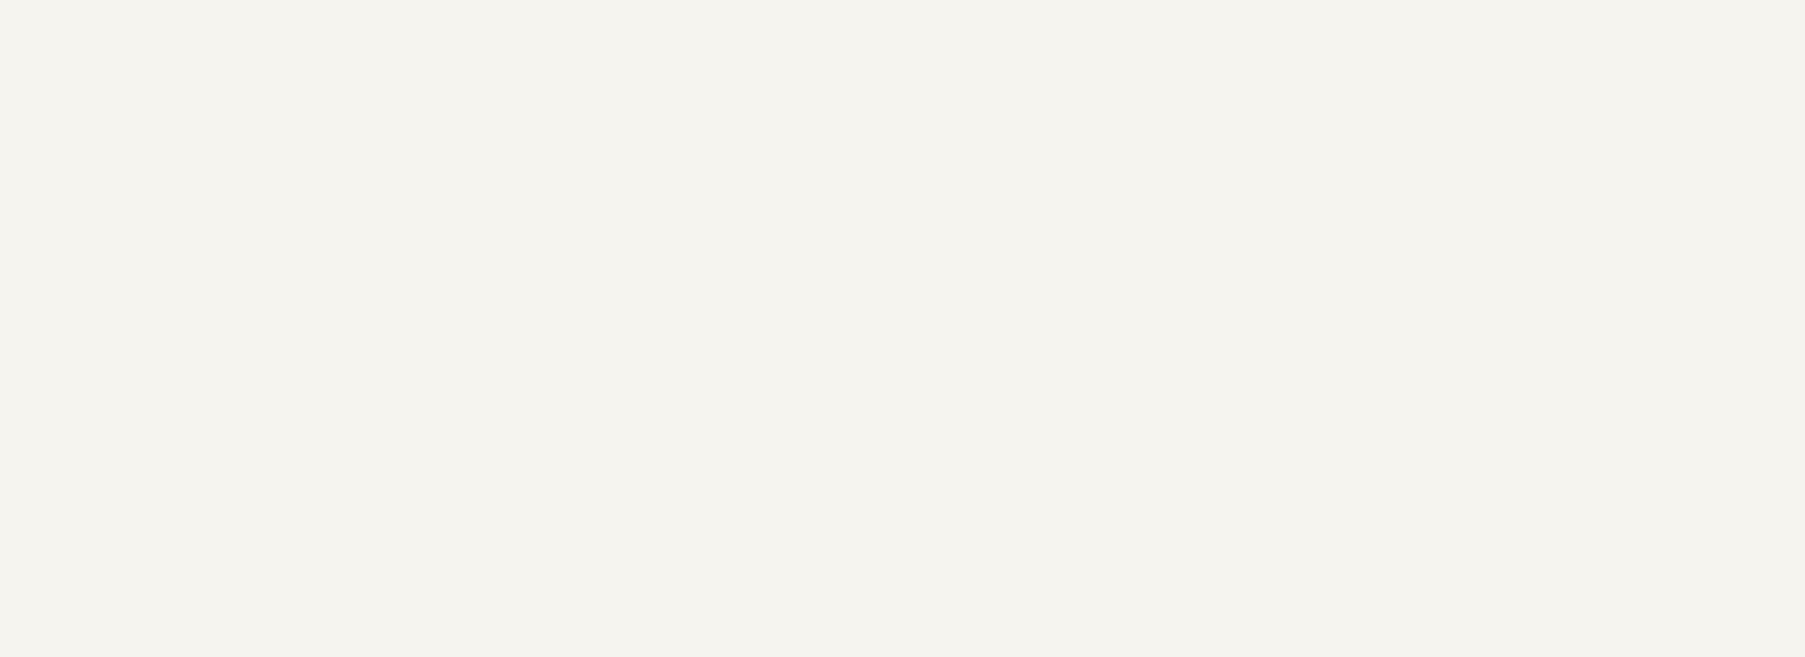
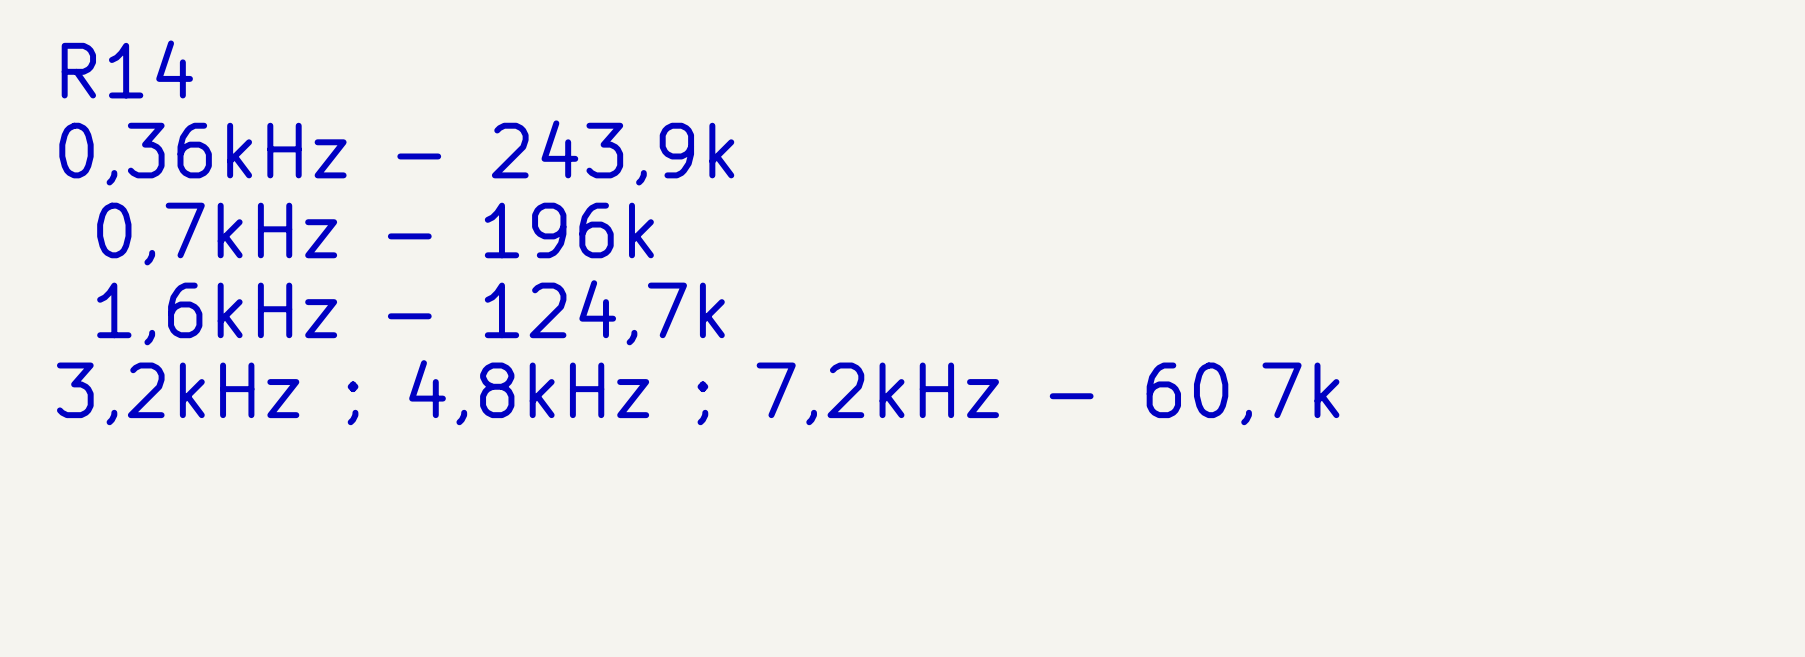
text: none -> R14 (127, 69)
text: none -> 0,36kHz - 243,9k (396, 152)
text: none -> 0,7kHz - 196k (375, 234)
text: none -> 1,6kHz - 124,7k (410, 312)
text: none -> 3,2kHz ; 4,8kHz ; 7,2kHz - 60,7k (698, 392)

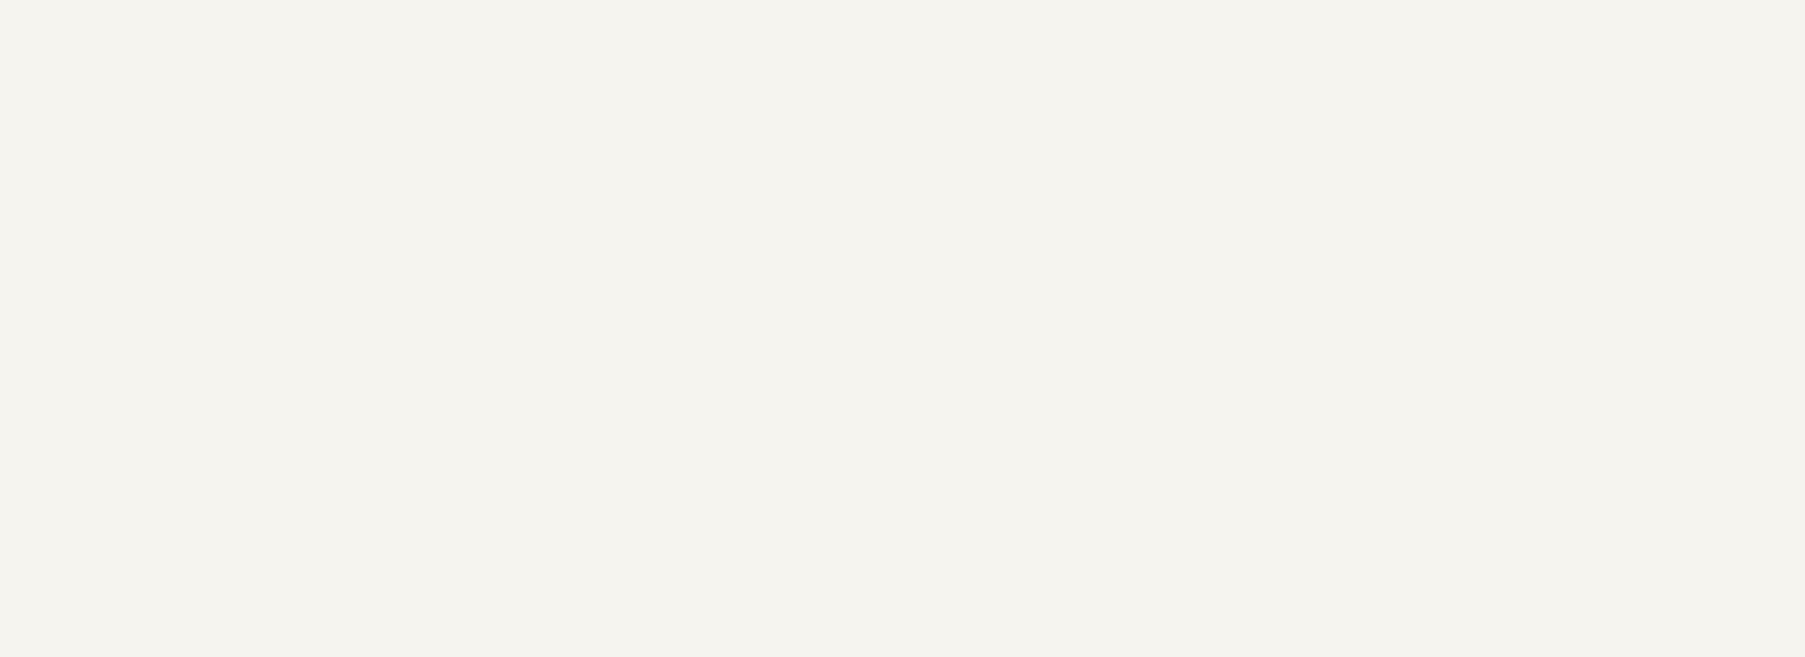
text: R14 (127, 69) -> none
text: 0,36kHz - 243,9k (396, 152) -> none
text: 0,7kHz - 196k (375, 234) -> none
text: 1,6kHz - 124,7k (410, 312) -> none
text: 3,2kHz ; 4,8kHz ; 7,2kHz - 60,7k (698, 392) -> none

